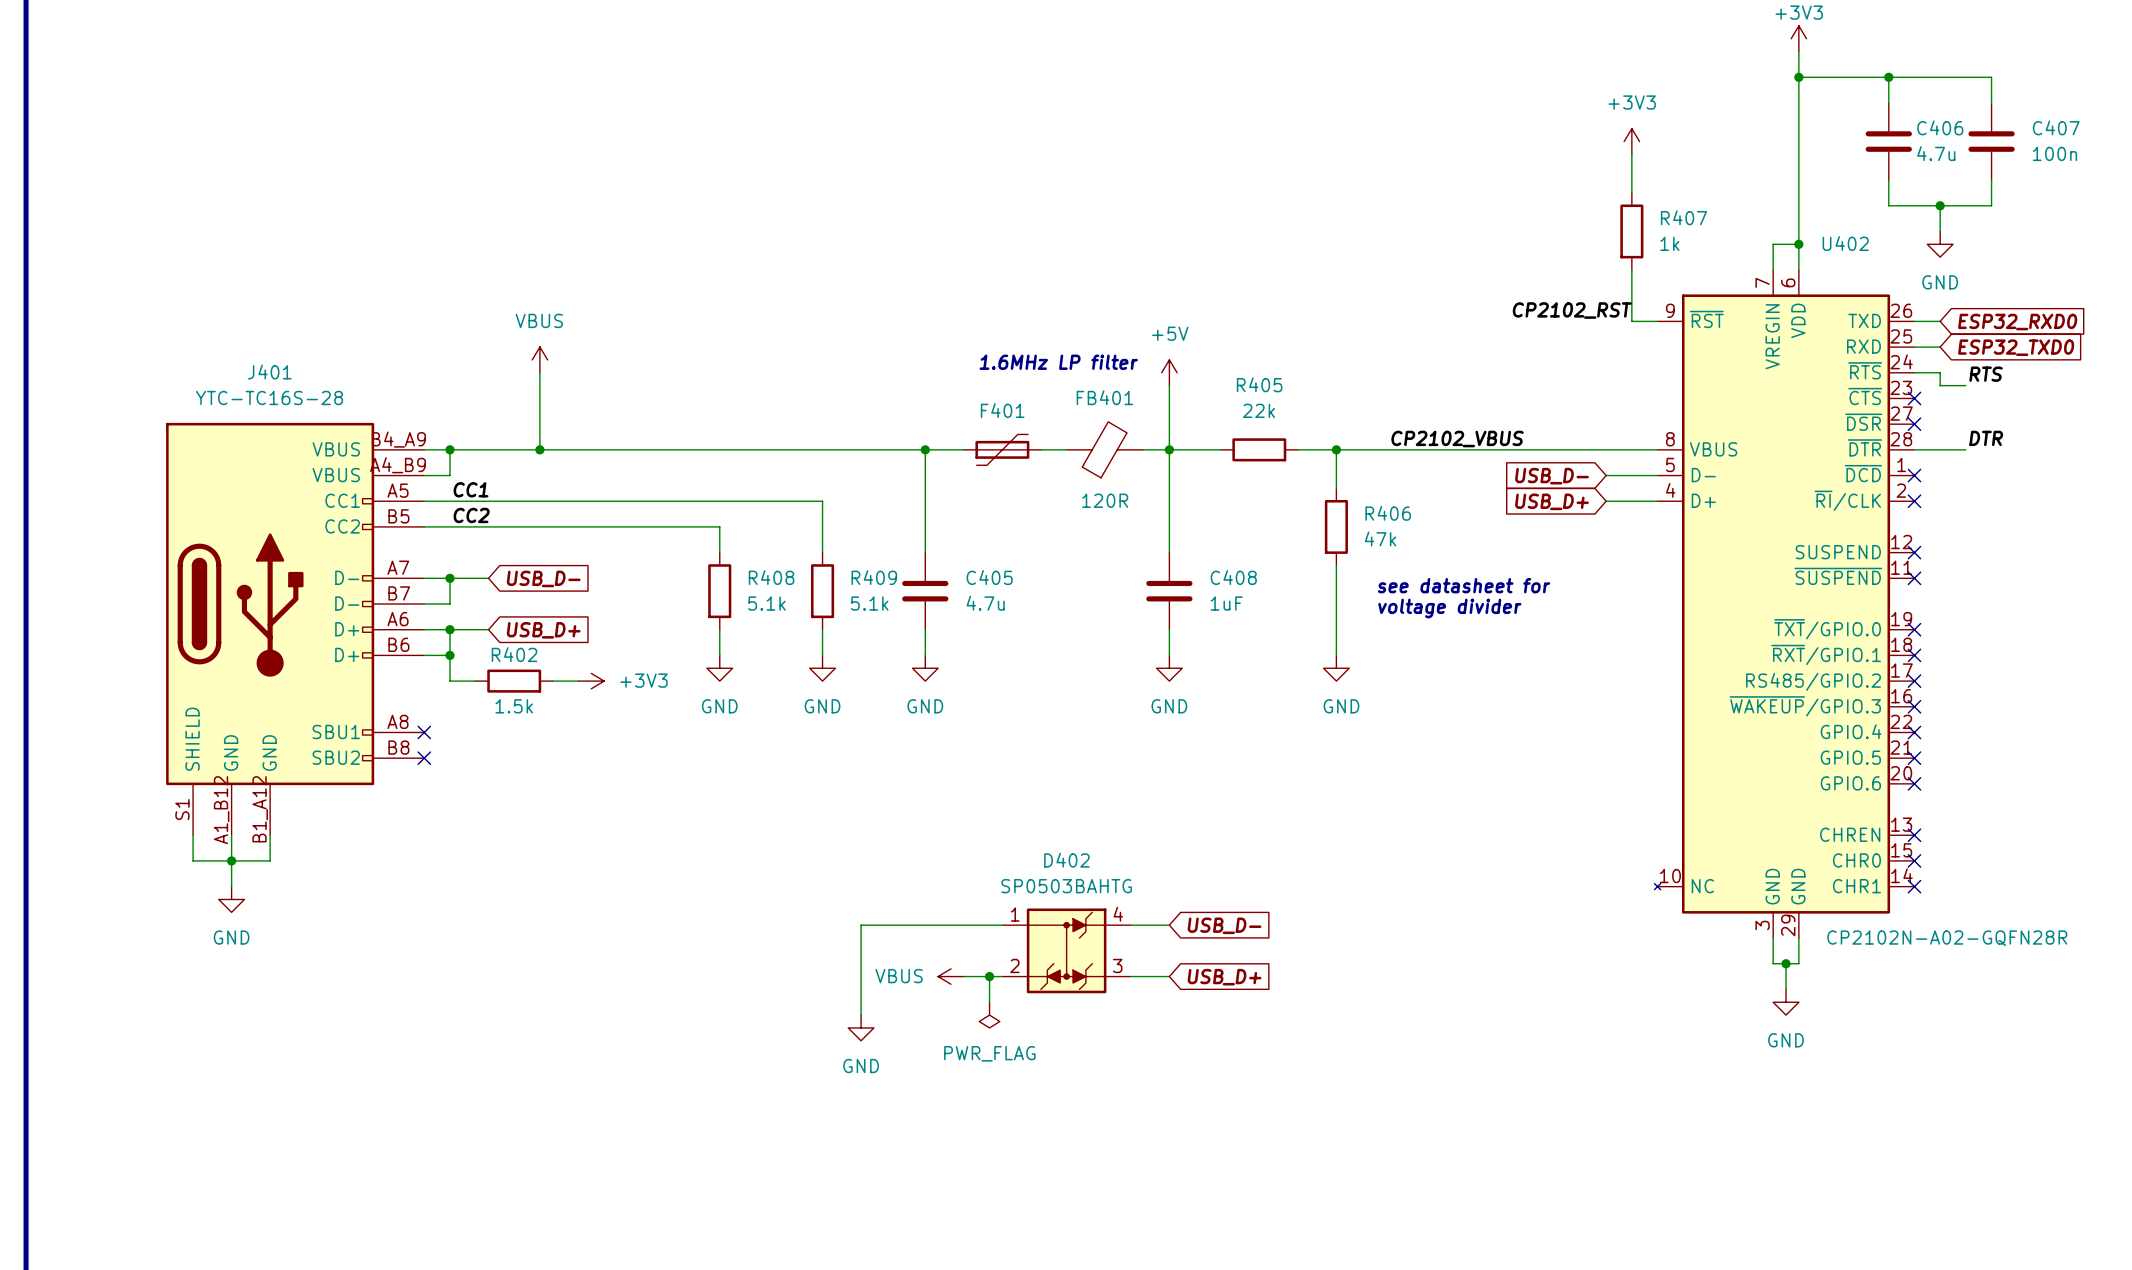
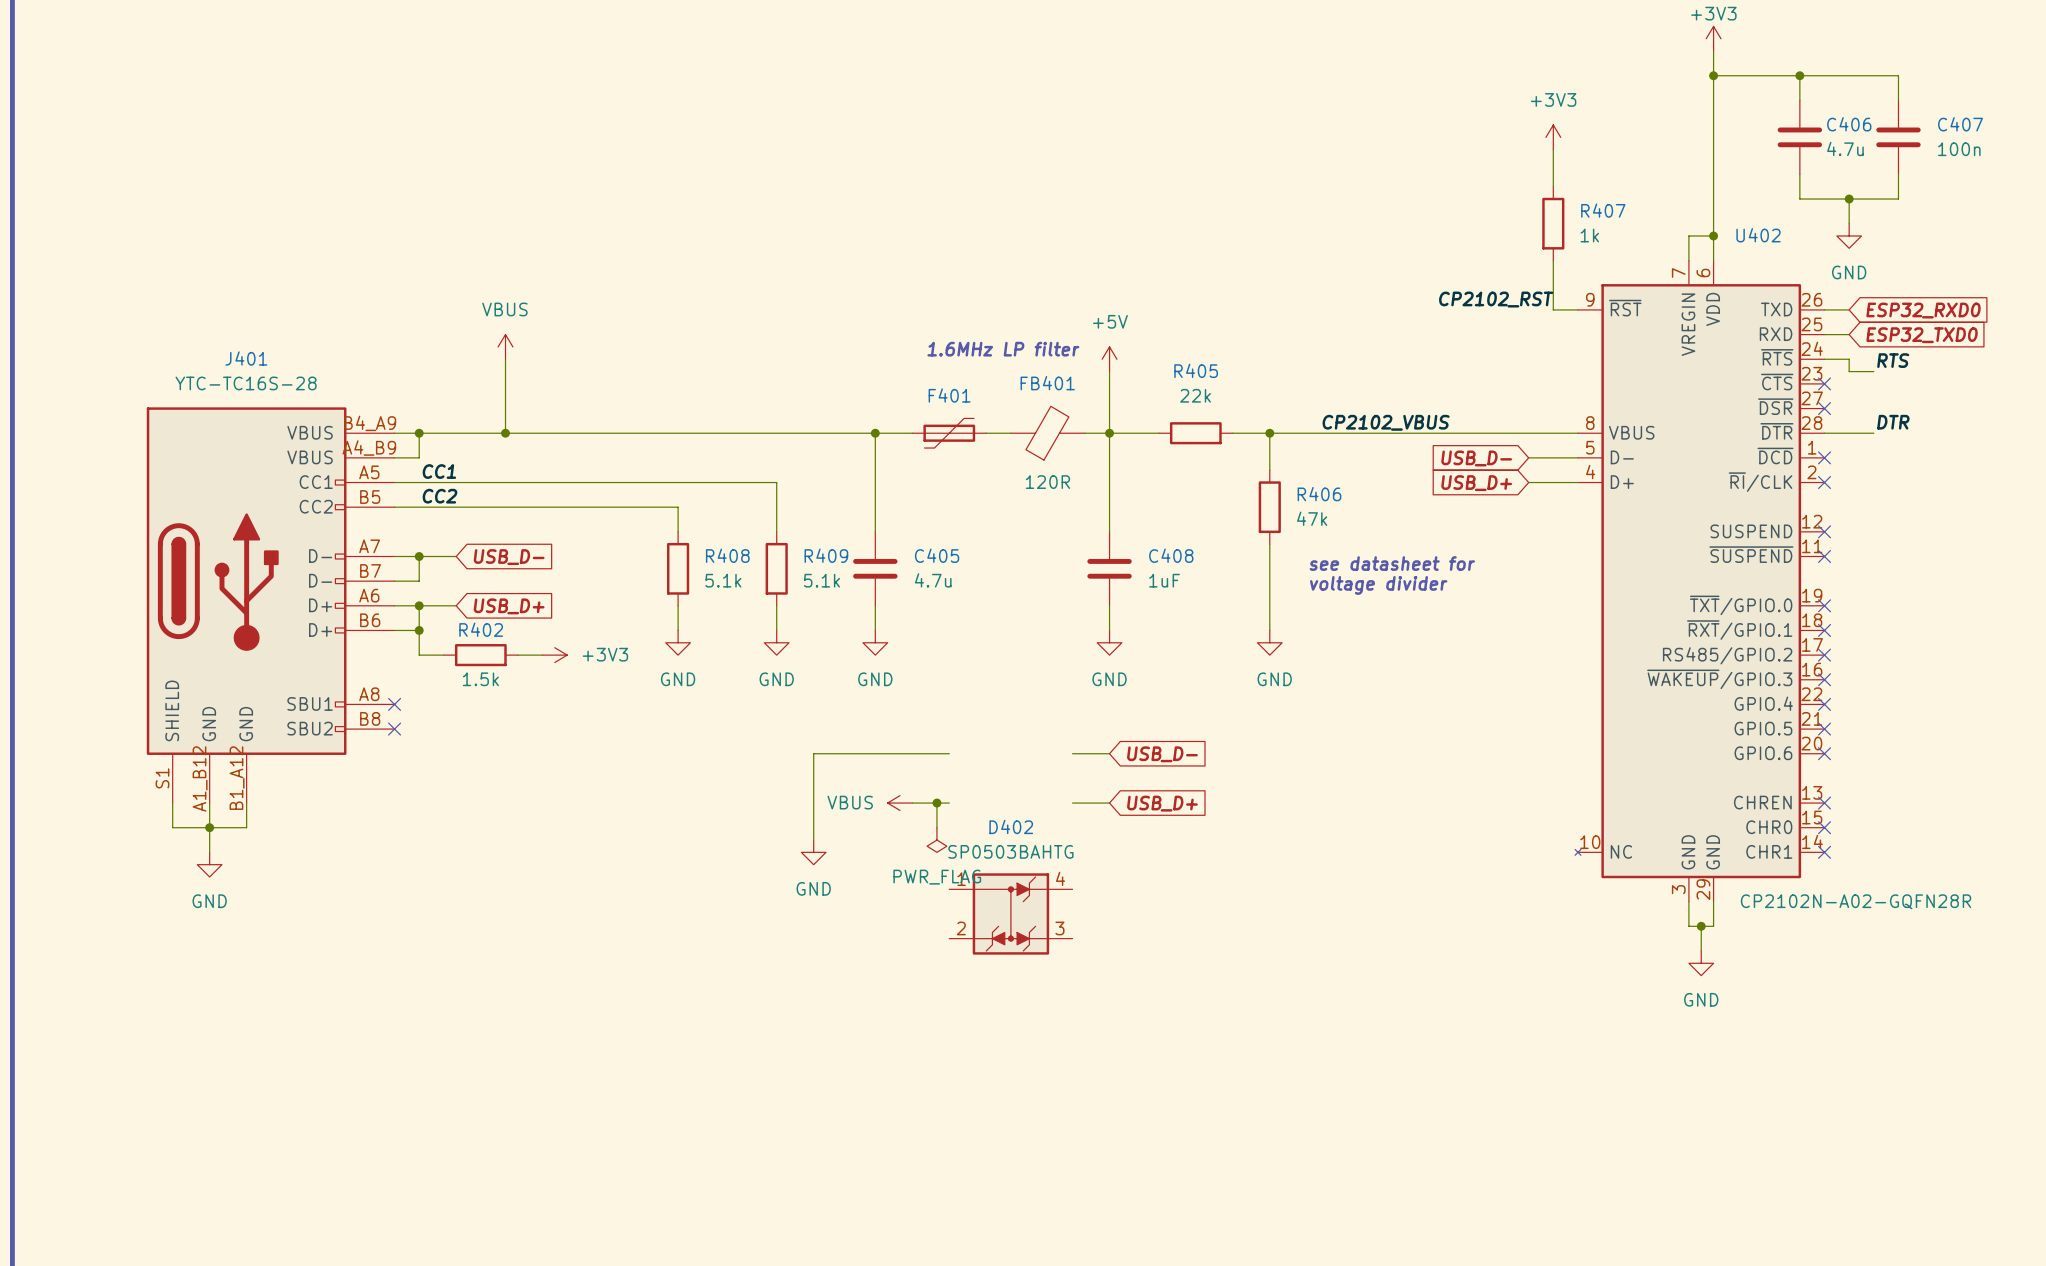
junction: none -> (936, 803)
wire: (1002, 925) (861, 925) (861, 1015) -> (949, 753) (813, 753) (813, 840)
wire: (1130, 925) (1169, 925) -> (1072, 753) (1109, 753)
global label position: USB_D- (1224, 925) -> USB_D- (1162, 754)
power symbol position: VBUS (951, 976) -> VBUS (899, 803)
wire: (963, 976) (1002, 976) -> (912, 803) (949, 803)
wire: (989, 976) (989, 1002) -> (936, 803) (936, 827)
junction: (989, 976) -> none
wire: (1130, 976) (1169, 976) -> (1072, 803) (1109, 803)
global label position: USB_D+ (1224, 977) -> USB_D+ (1162, 803)
power symbol position: PWR_FLAG (989, 1015) -> PWR_FLAG (936, 840)
power symbol position: GND (861, 1027) -> GND (813, 852)

